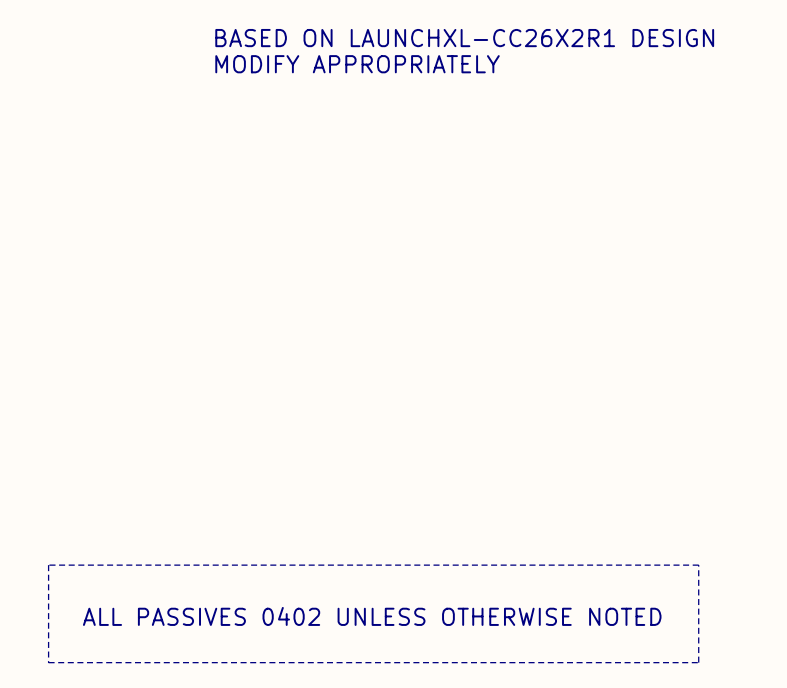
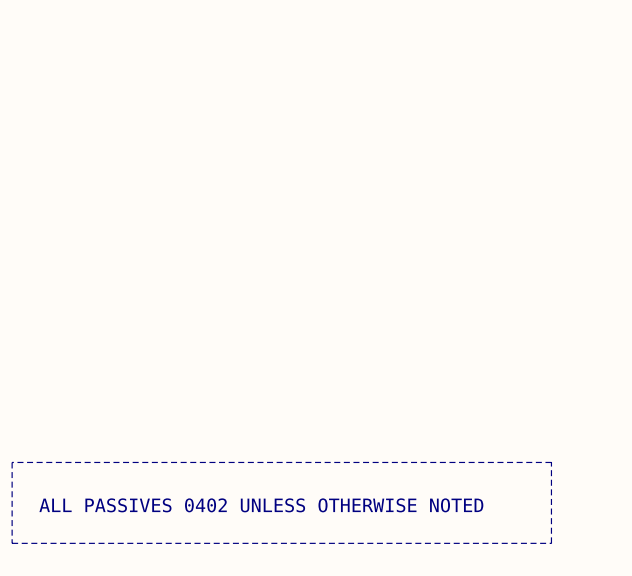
text: BASED ON LAUNCHXL-CC26X2R1 DESIGN (464, 38) -> none
text: MODIFY APPROPRIATELY (357, 64) -> none

